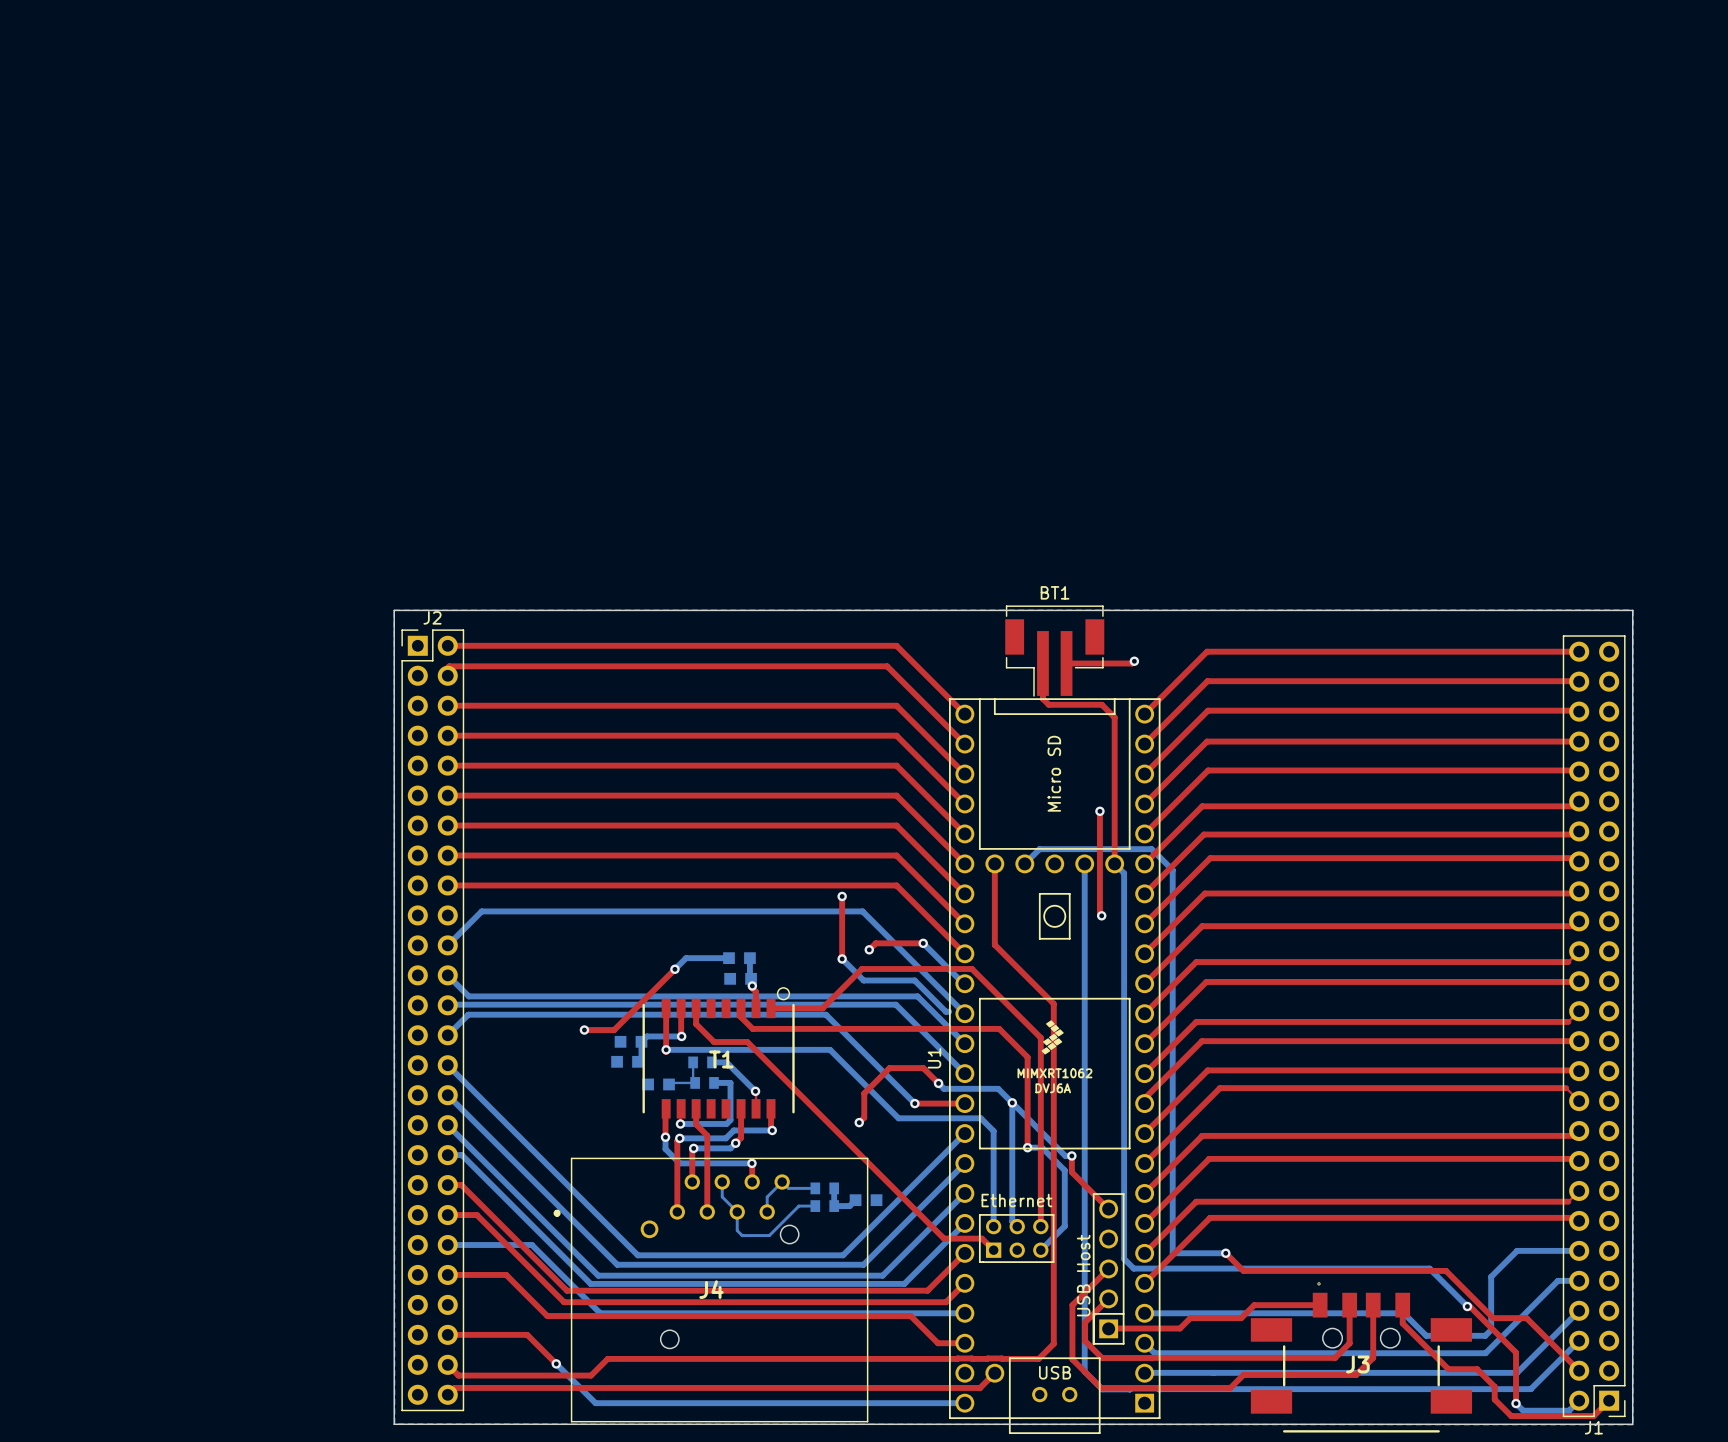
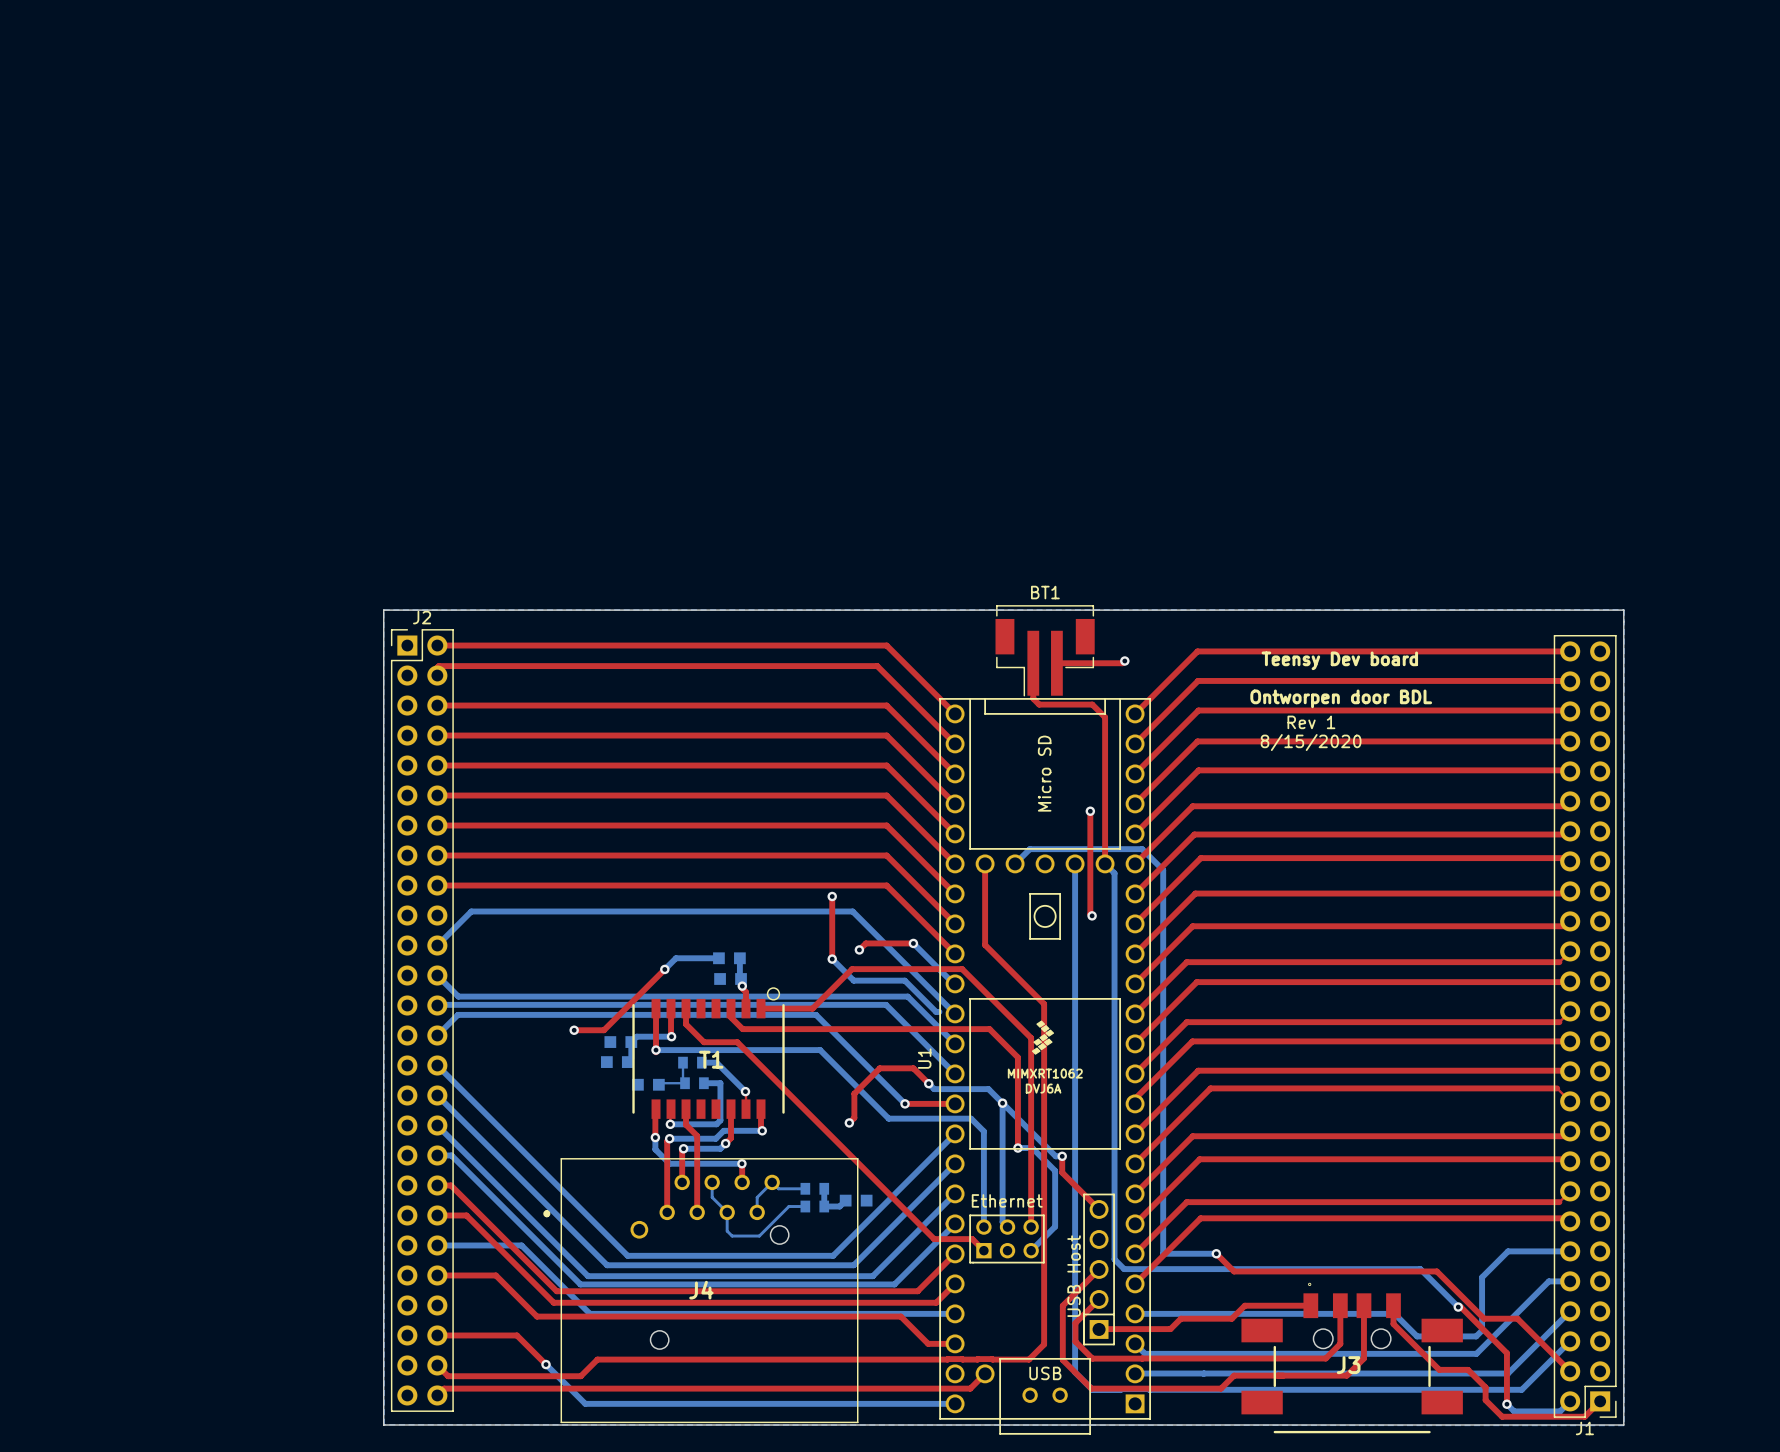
text: none -> Teensy Dev board (1339, 660)
text: none -> Ontworpen door BDL (1341, 698)
text: none -> Rev 1 (1311, 722)
text: none -> 8/15/2020 (1311, 742)

